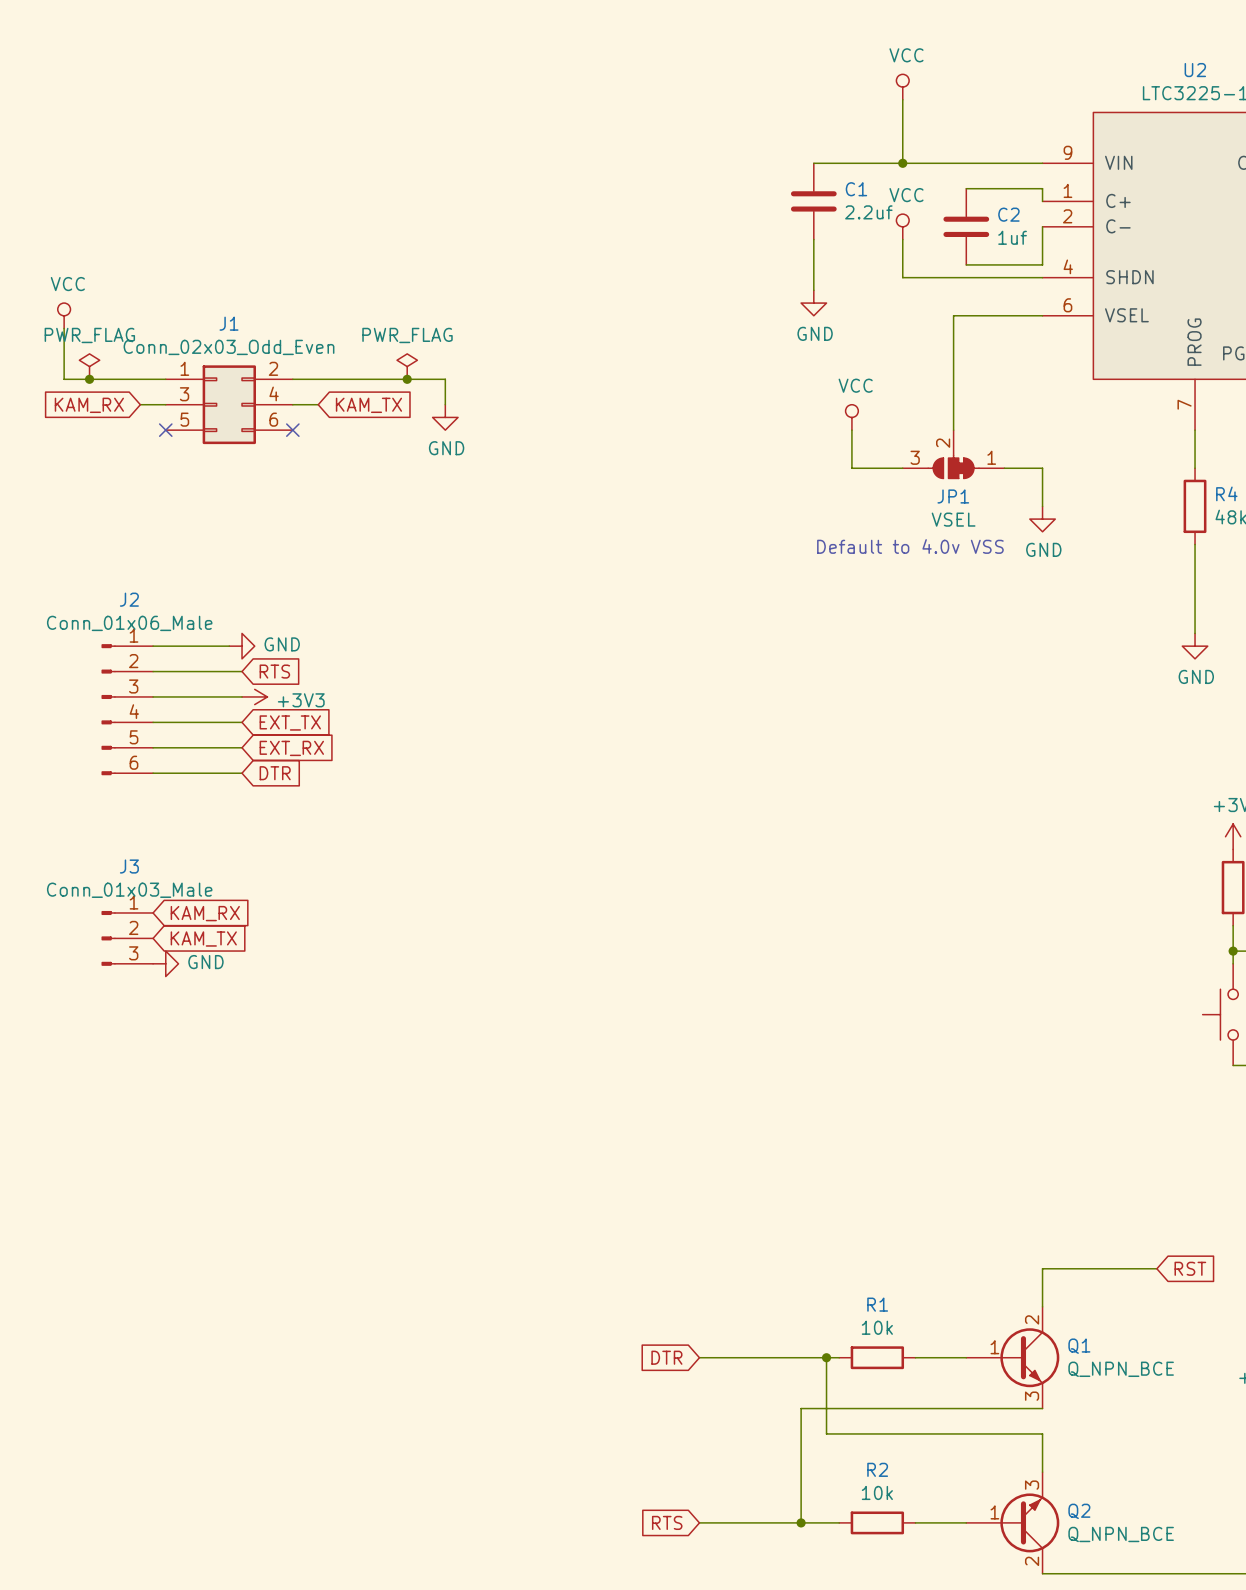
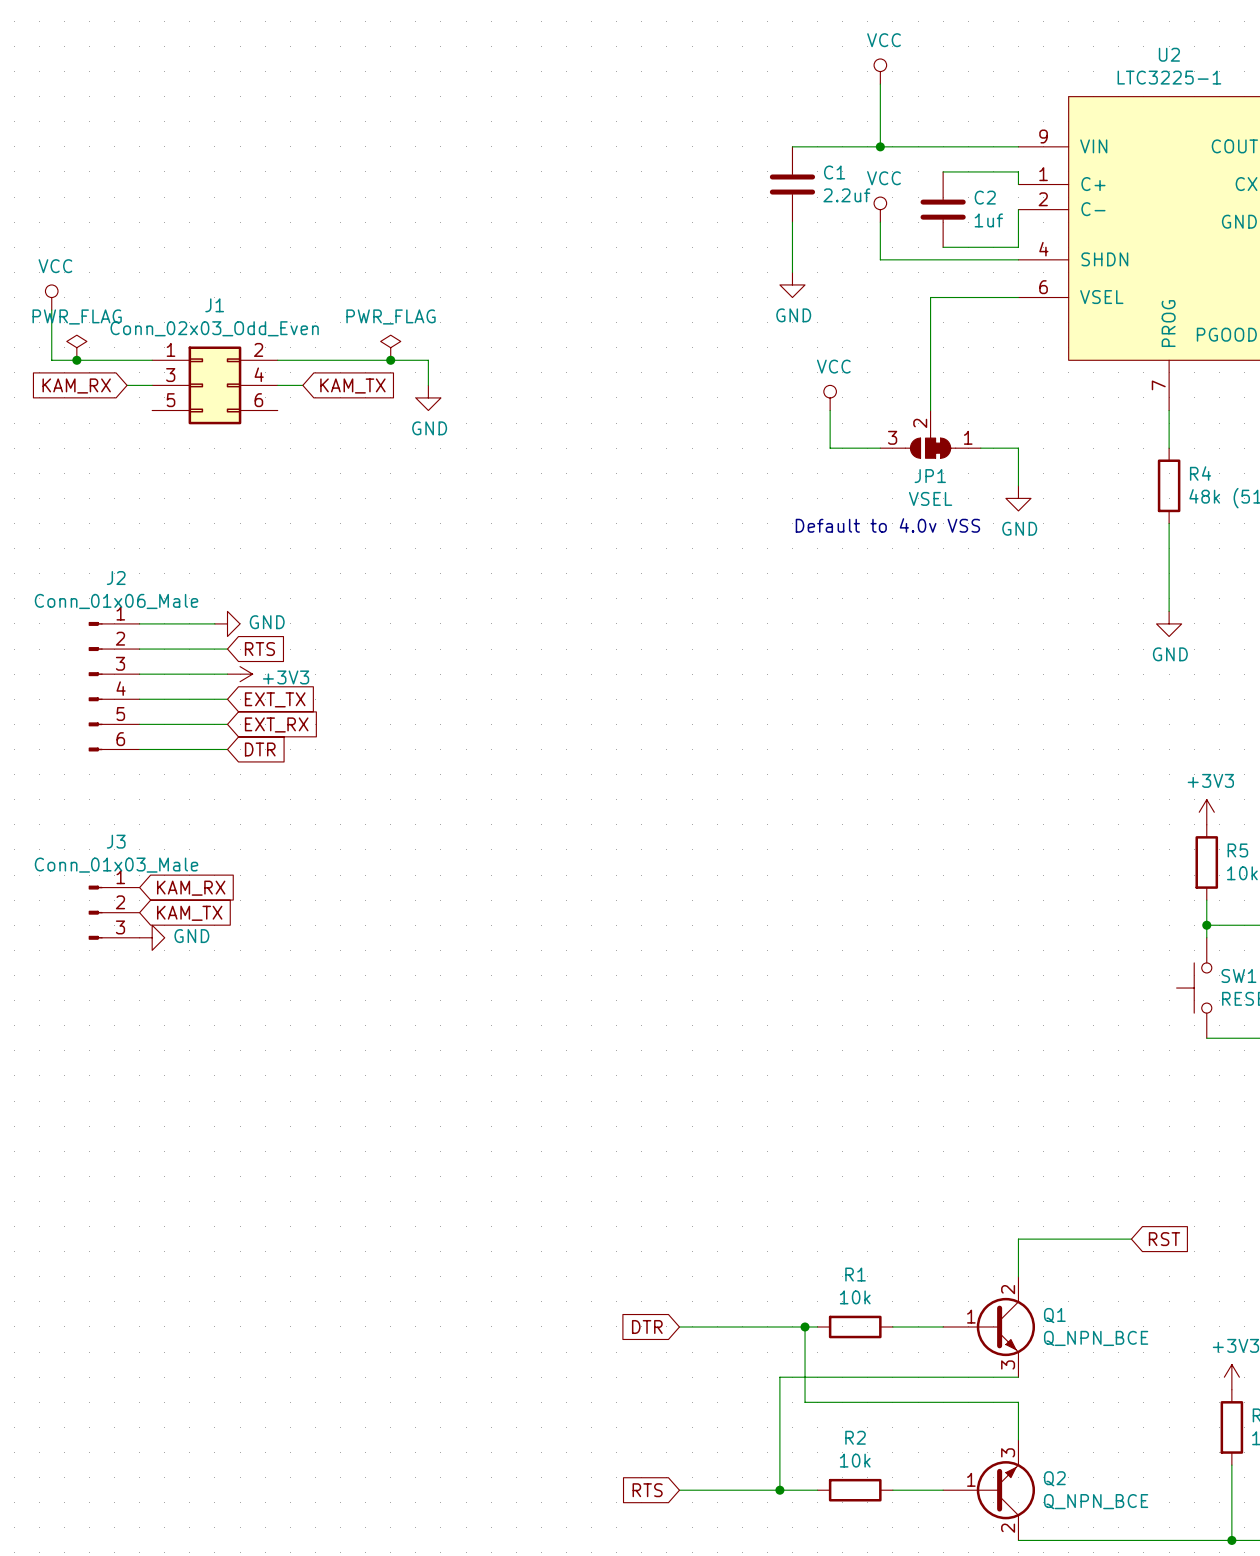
no-connect mark: (165, 430) -> none
no-connect mark: (292, 430) -> none

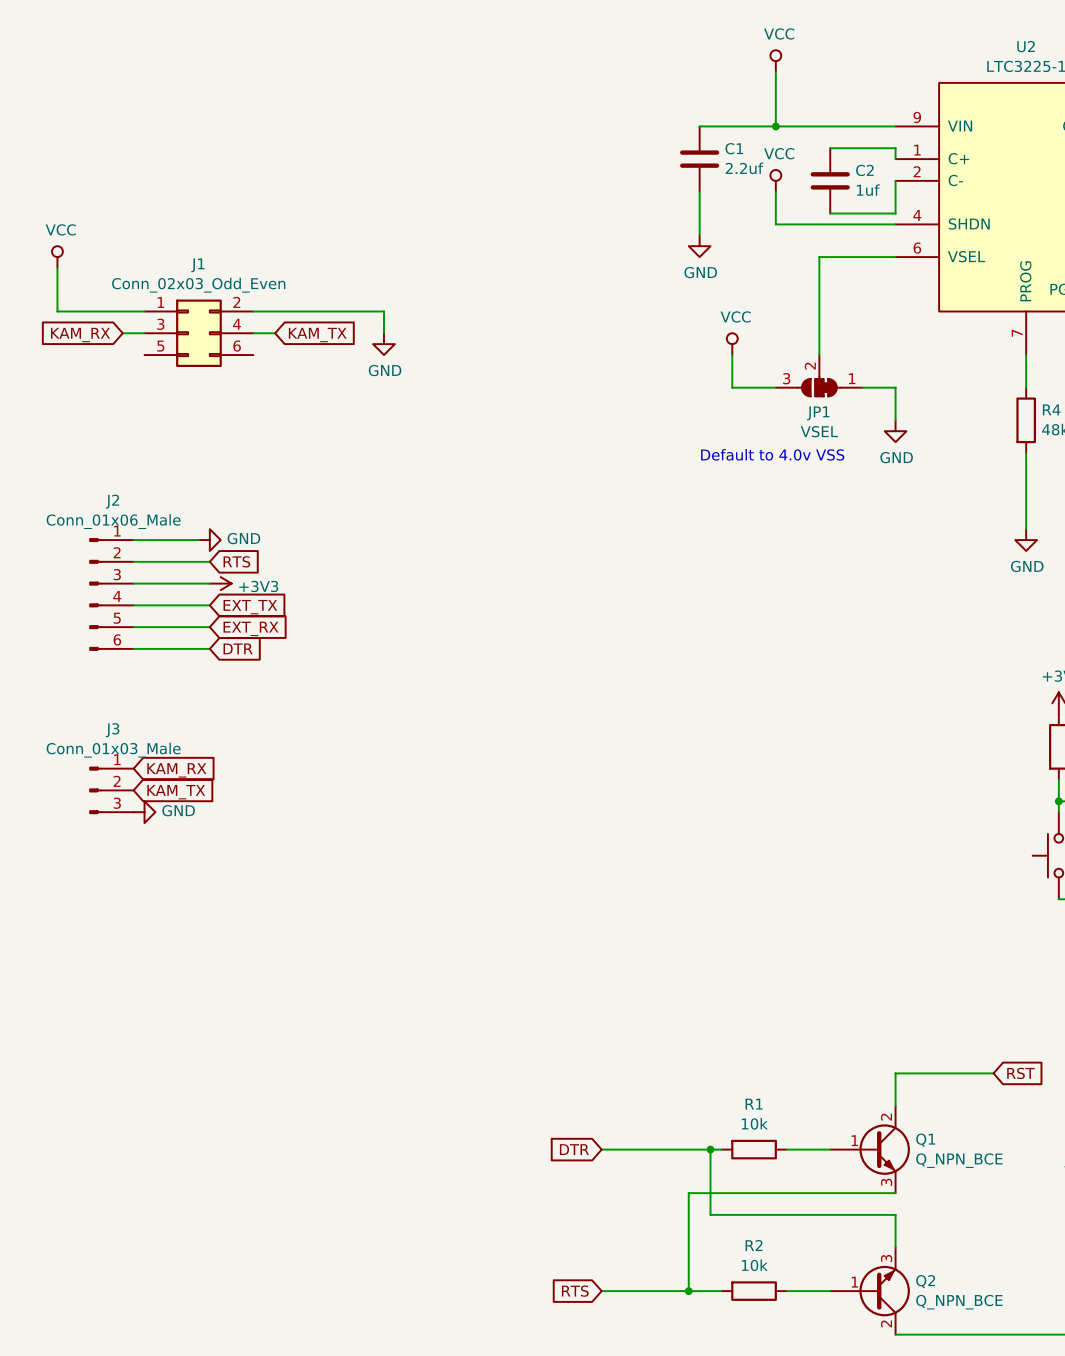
power symbol: PWR_FLAG (76, 347) -> none
power symbol: PWR_FLAG (390, 347) -> none
junction: (76, 360) -> none
junction: (390, 360) -> none

